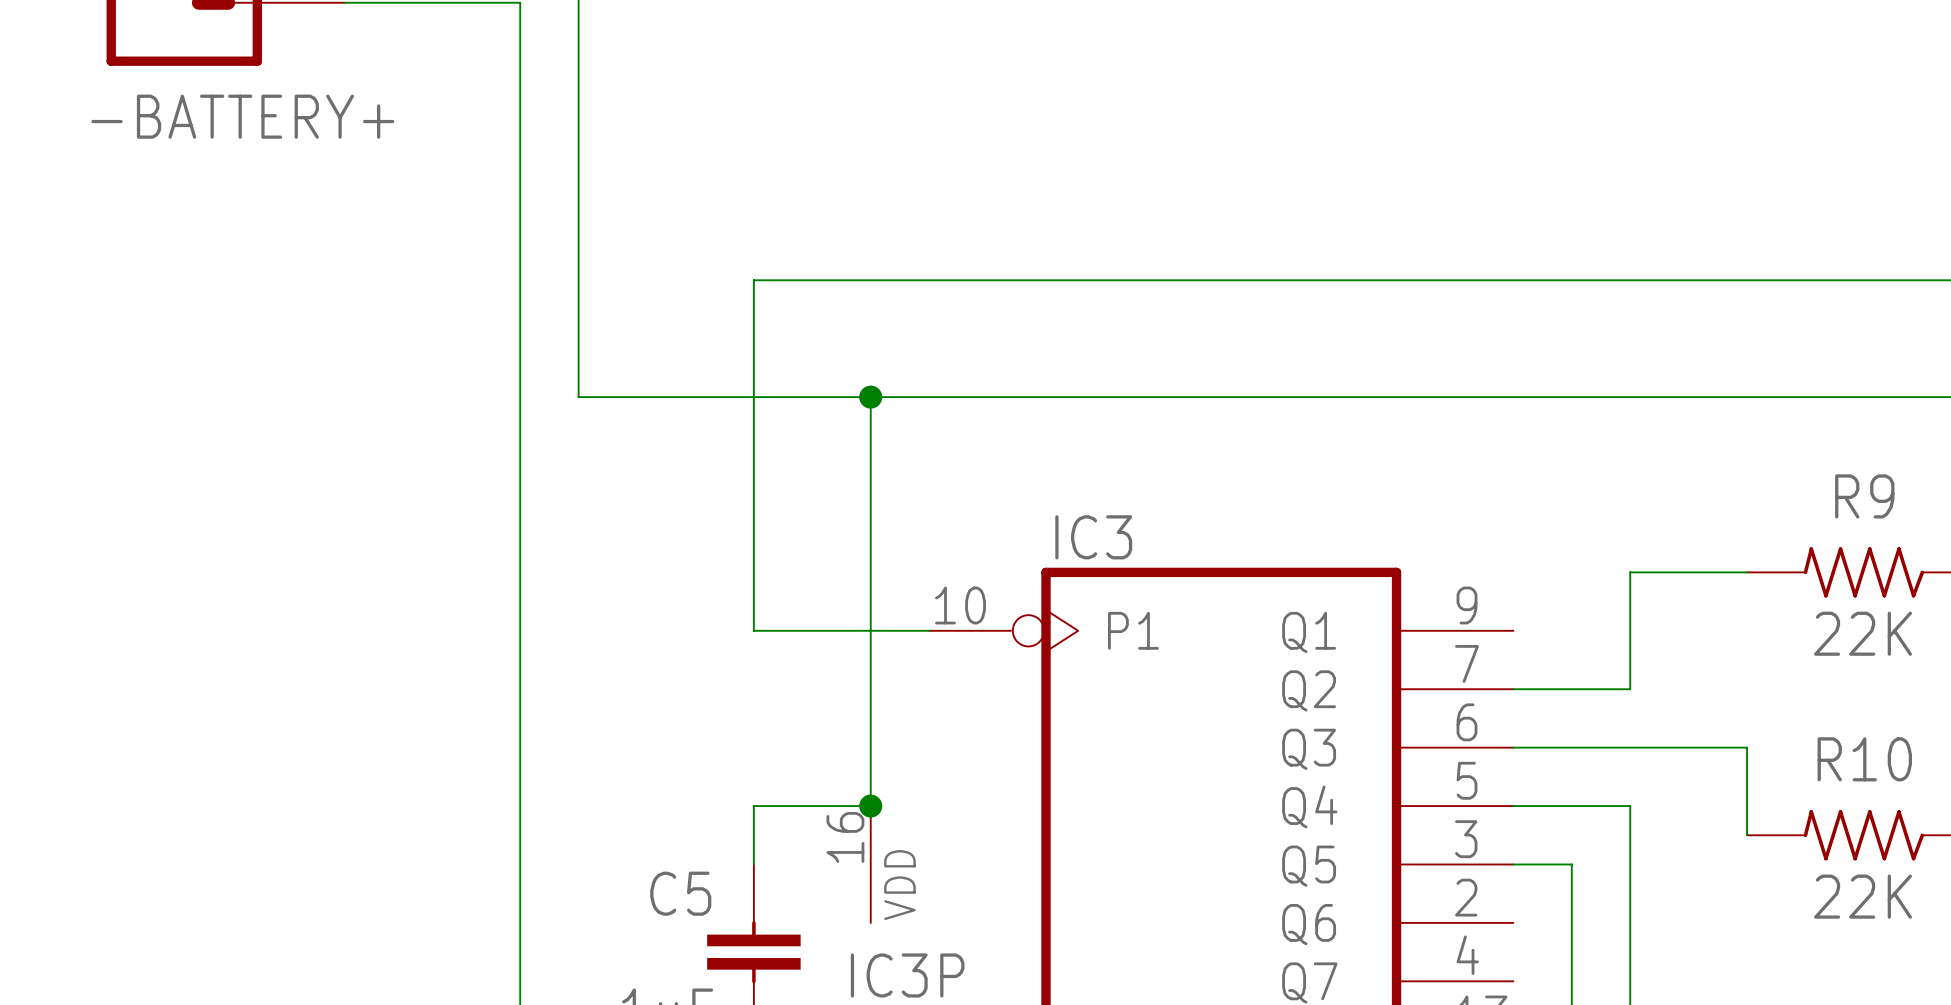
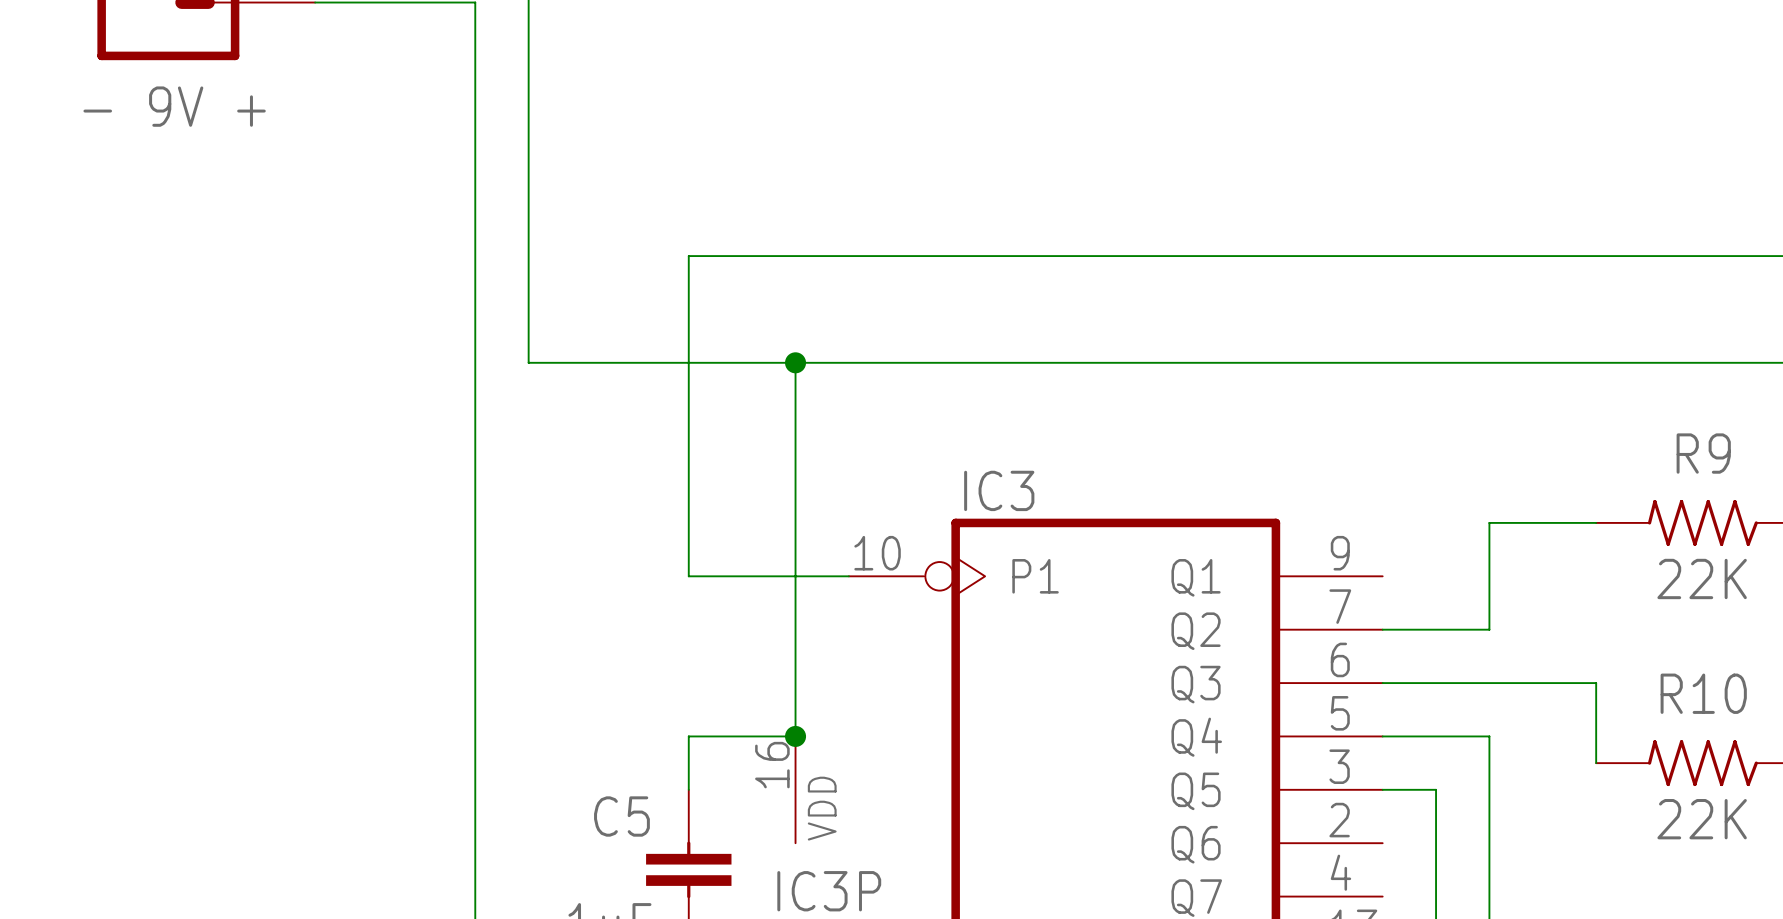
part value: -BATTERY+ (242, 116) -> - 9V + (174, 106)

